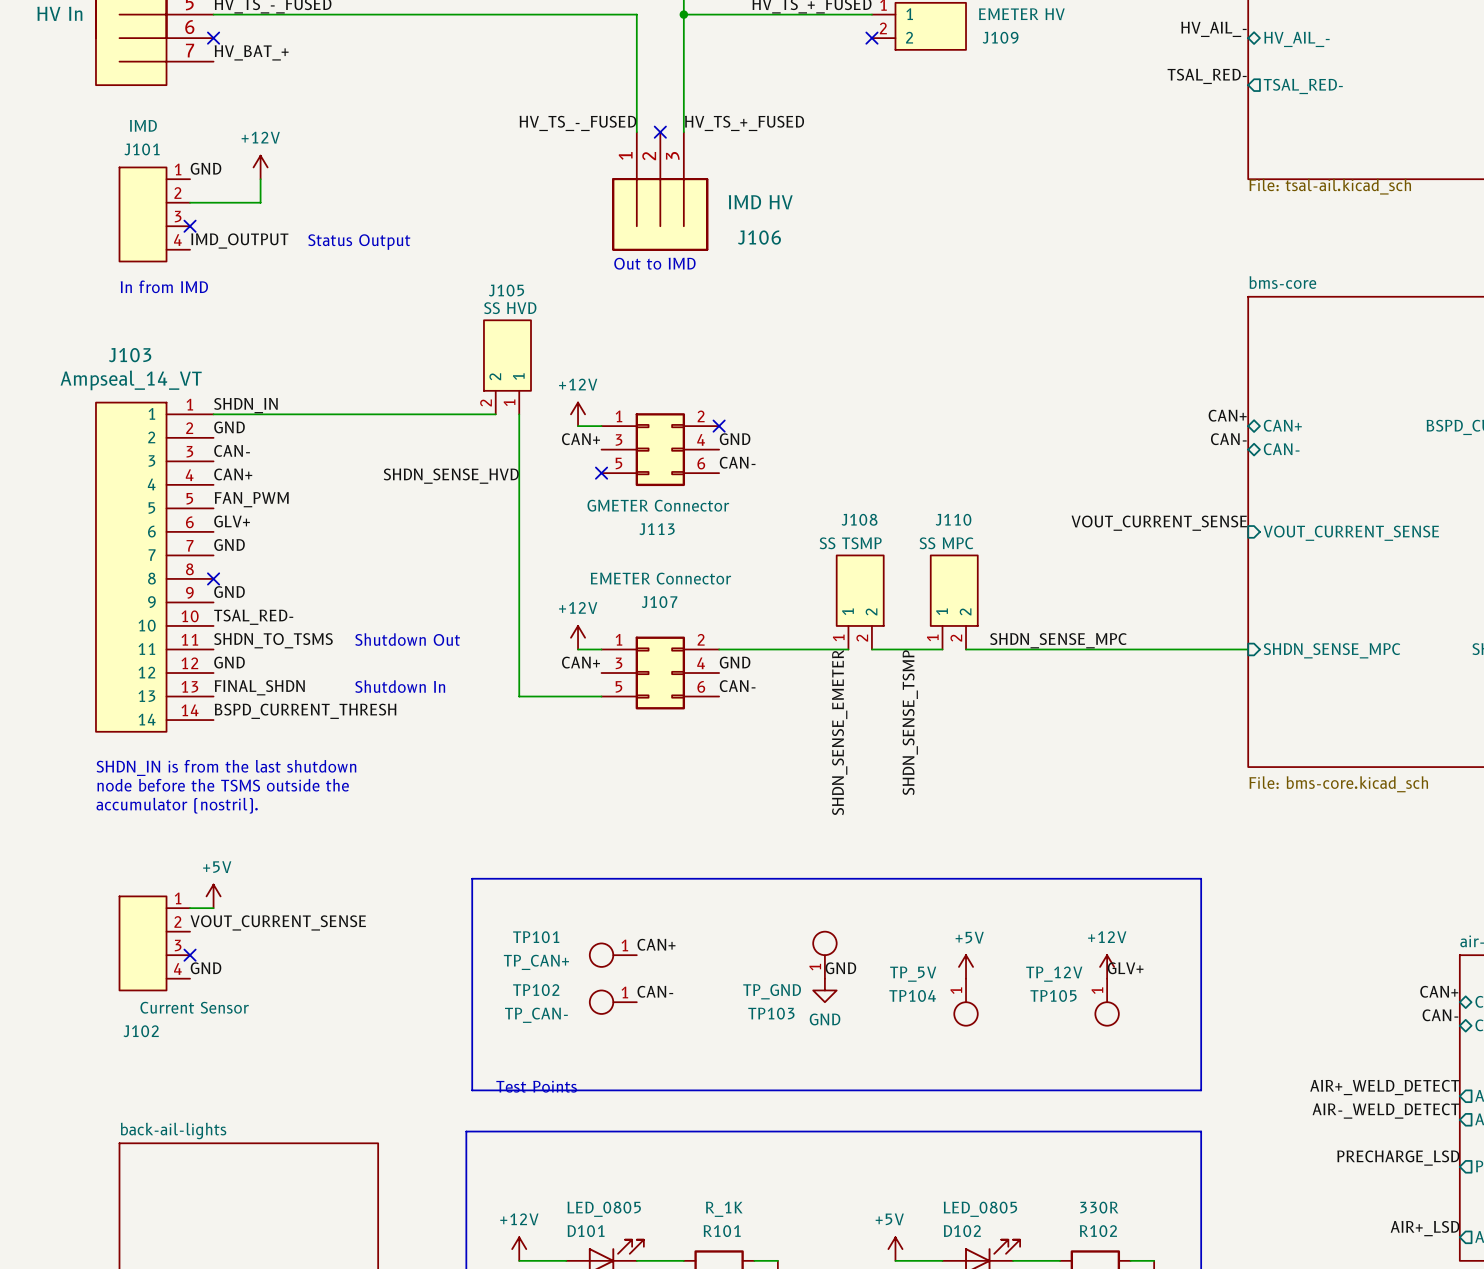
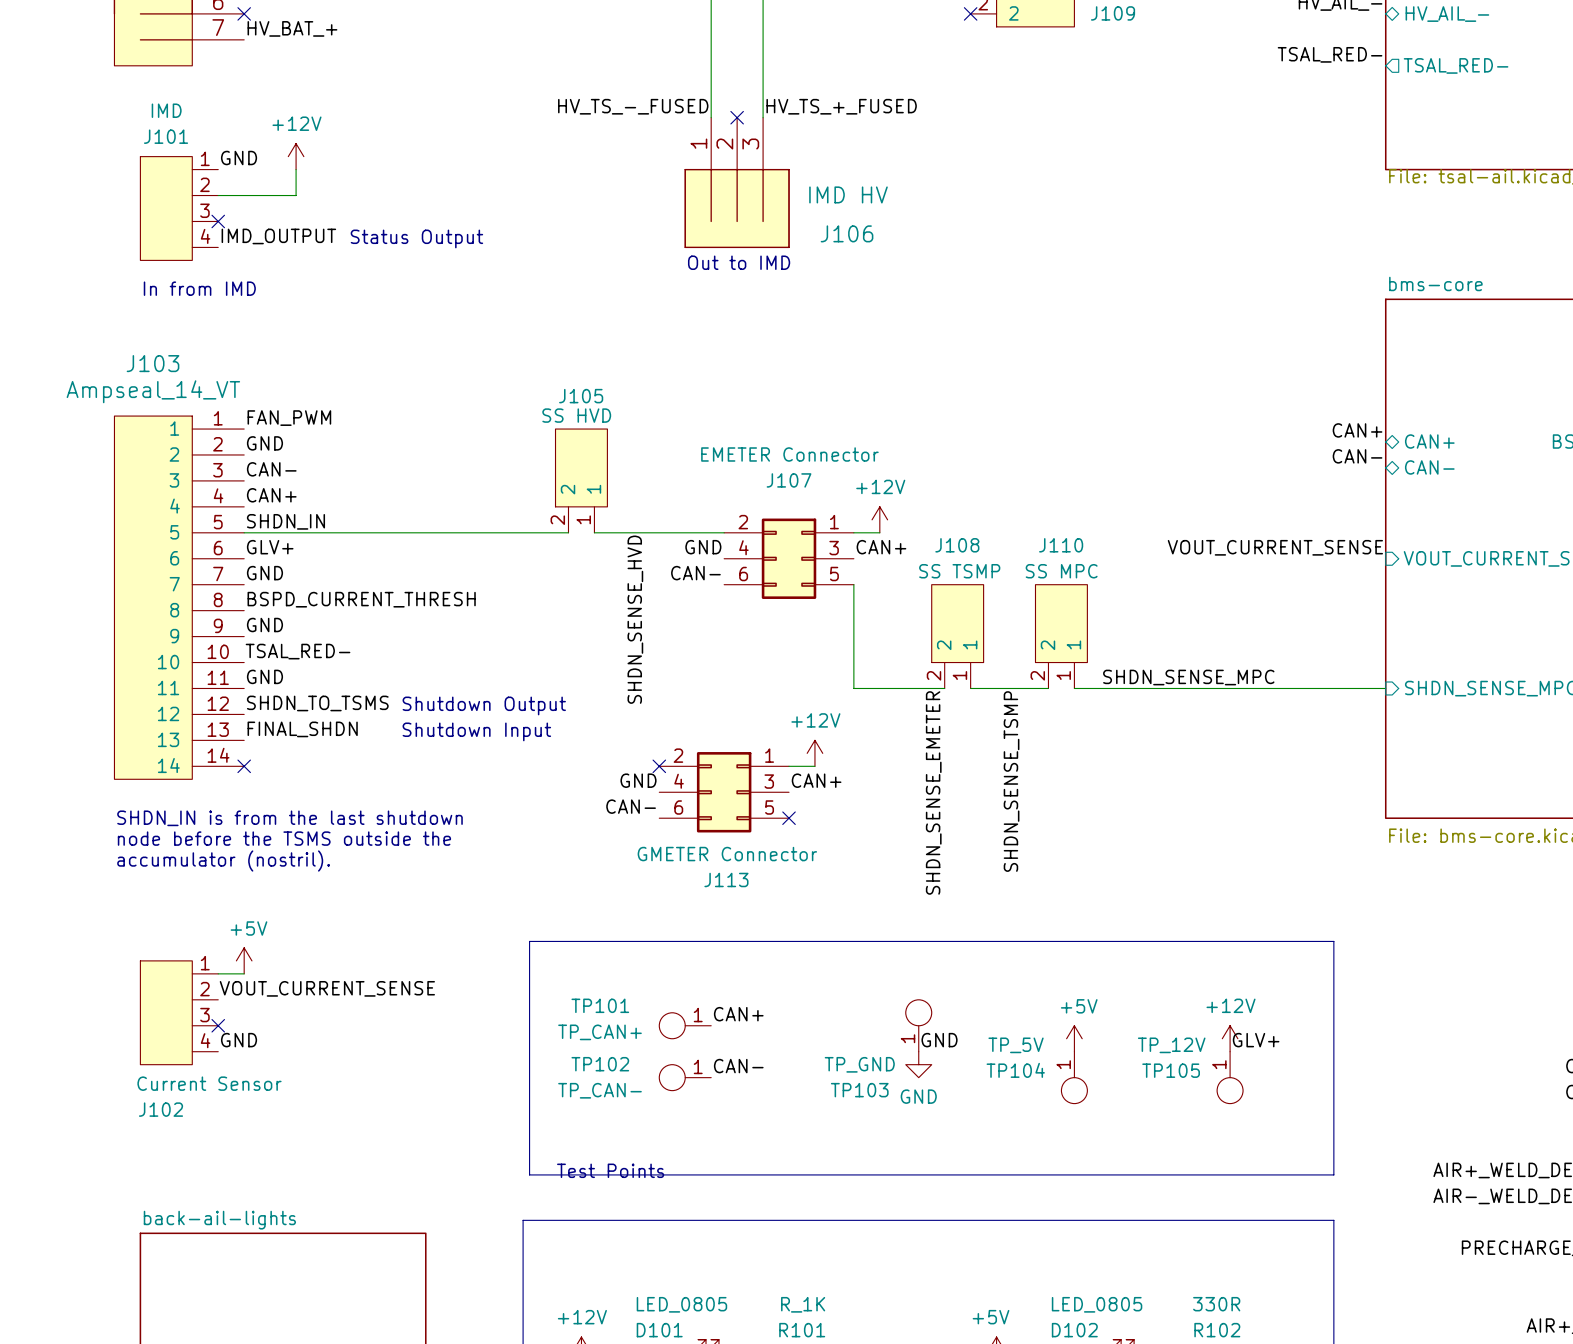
J105 position: (507, 367) -> (581, 480)
label: SHDN_IN (245, 405) -> FAN_PWM (289, 418)
wire: (213, 414) (495, 414) -> none
wire: (519, 414) (519, 696) (601, 696) -> none
power symbol: +12V (578, 414) -> none
wire: (578, 426) (601, 426) -> (853, 532) (879, 532)
no-connect mark: (719, 426) -> none
label: CAN+ (581, 439) -> none
label: GND (735, 439) -> none
J113 flip: as is (660, 449) -> left-right (724, 792)
J113 position: (660, 449) -> (724, 792)
label: CAN- (737, 462) -> none
no-connect mark: (601, 473) -> none
label rotation: 0° (451, 476) -> 90° counterclockwise (635, 619)
label position: SHDN_SENSE_HVD (451, 476) -> SHDN_SENSE_HVD (635, 619)
power symbol: none -> +12V (879, 519)
label: FAN_PWM (251, 499) -> SHDN_IN (285, 521)
wire: none -> (244, 532) (568, 532)
wire: none -> (594, 532) (724, 532)
label: none -> GND (703, 547)
label: none -> CAN+ (881, 547)
label: none -> CAN- (695, 573)
no-connect mark: (213, 578) -> none
J108 flip: as is (860, 590) -> left-right (957, 623)
J110 flip: as is (954, 590) -> left-right (1061, 623)
power symbol: +12V (578, 637) -> none
text: Shutdown Out (407, 639) -> Shutdown Output (484, 705)
label: SHDN_TO_TSMS (273, 640) -> GND (264, 676)
wire: (578, 649) (601, 649) -> (789, 766) (814, 766)
wire: (719, 649) (766, 649) -> (853, 584) (853, 688)
label: GND (229, 662) -> SHDN_TO_TSMS (317, 703)
label: CAN+ (581, 662) -> none
label: GND (735, 662) -> none
J107 flip: as is (660, 673) -> left-right (789, 558)
J107 position: (660, 673) -> (789, 558)
text: Shutdown In (400, 686) -> Shutdown Input (476, 731)
label: CAN- (737, 686) -> none
power symbol: none -> +12V (814, 753)
label position: BSPD_CURRENT_THRESH (305, 711) -> BSPD_CURRENT_THRESH (361, 599)
no-connect mark: none -> (244, 766)
no-connect mark: none -> (659, 766)
label: none -> GND (638, 780)
label: none -> CAN+ (816, 780)
label: none -> CAN- (631, 806)
no-connect mark: none -> (789, 818)

